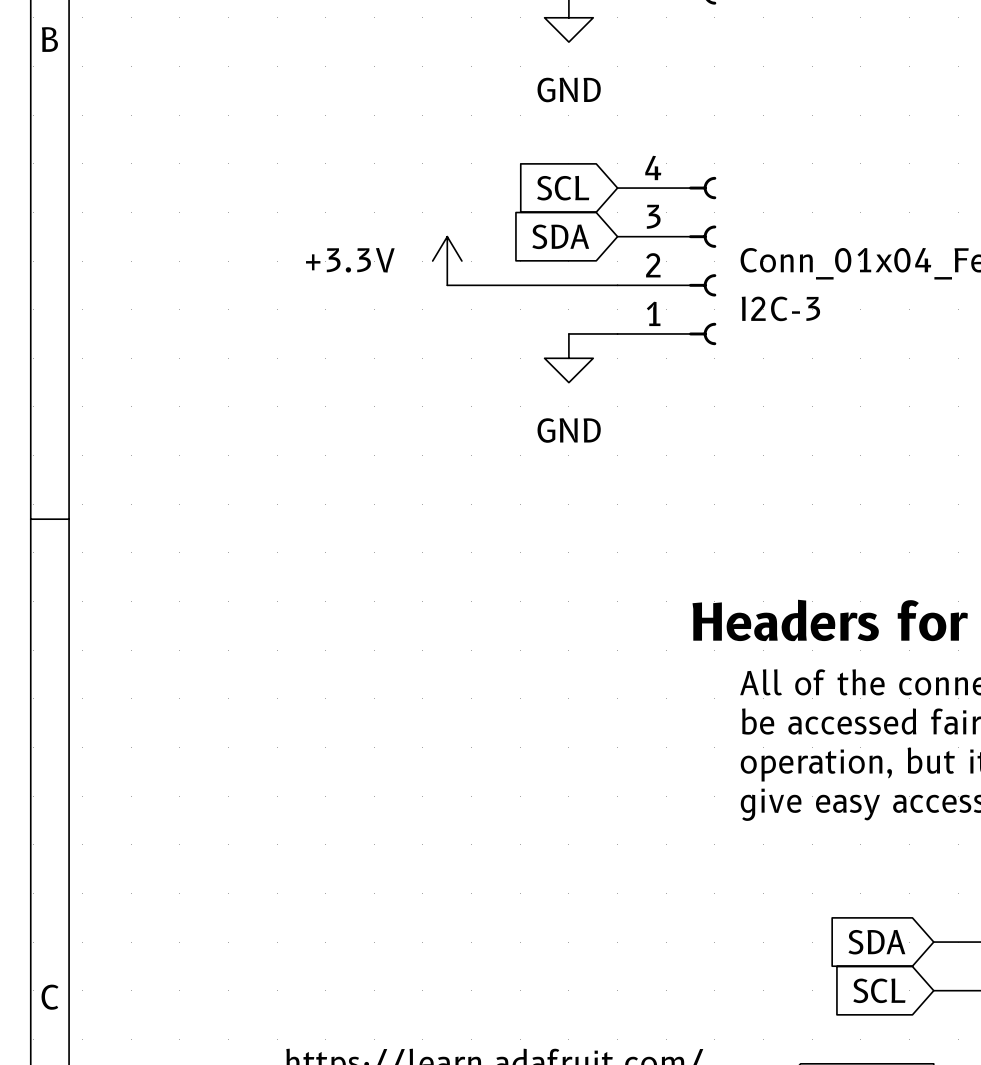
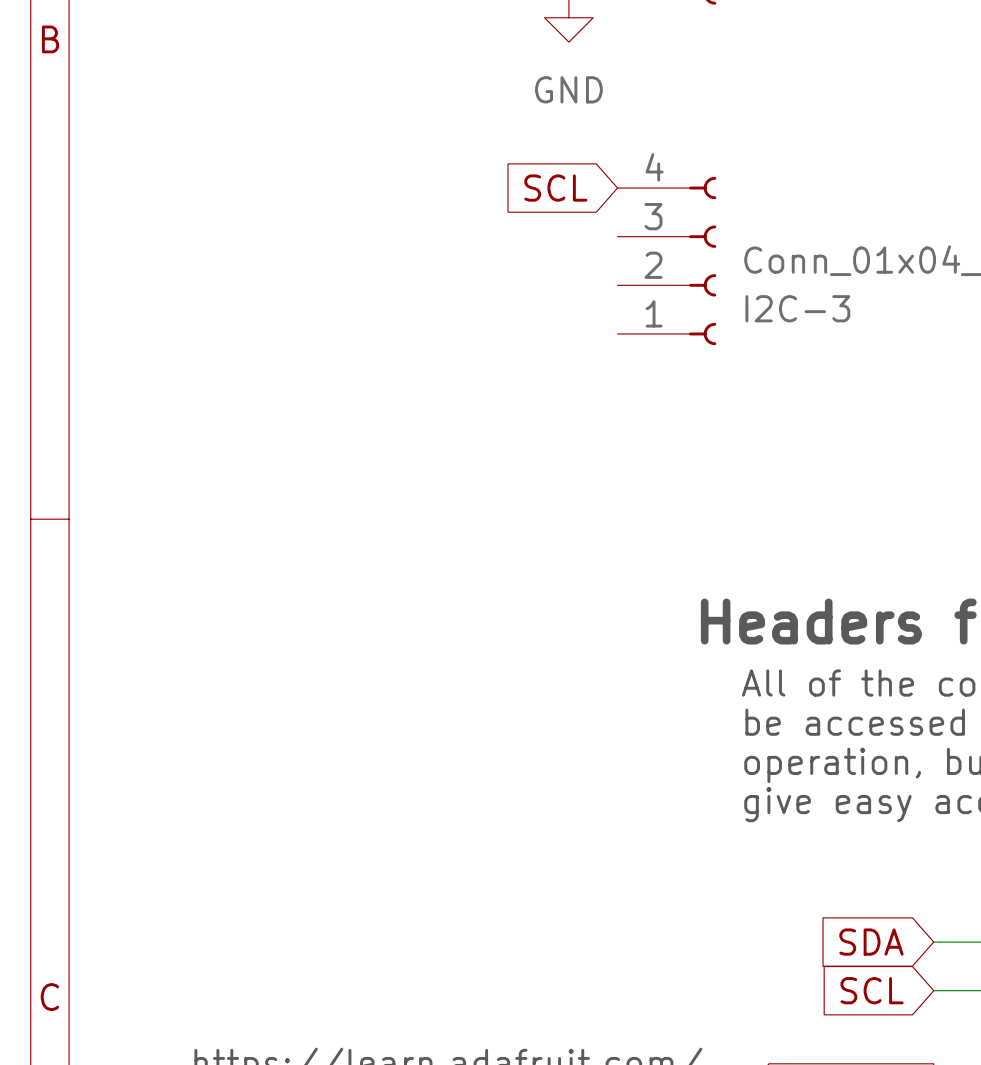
global label: SDA (560, 236) -> none
power symbol: +3.3V (447, 261) -> none
wire: (447, 285) (617, 285) -> none
wire: (568, 333) (617, 333) -> none
power symbol: GND (568, 358) -> none

